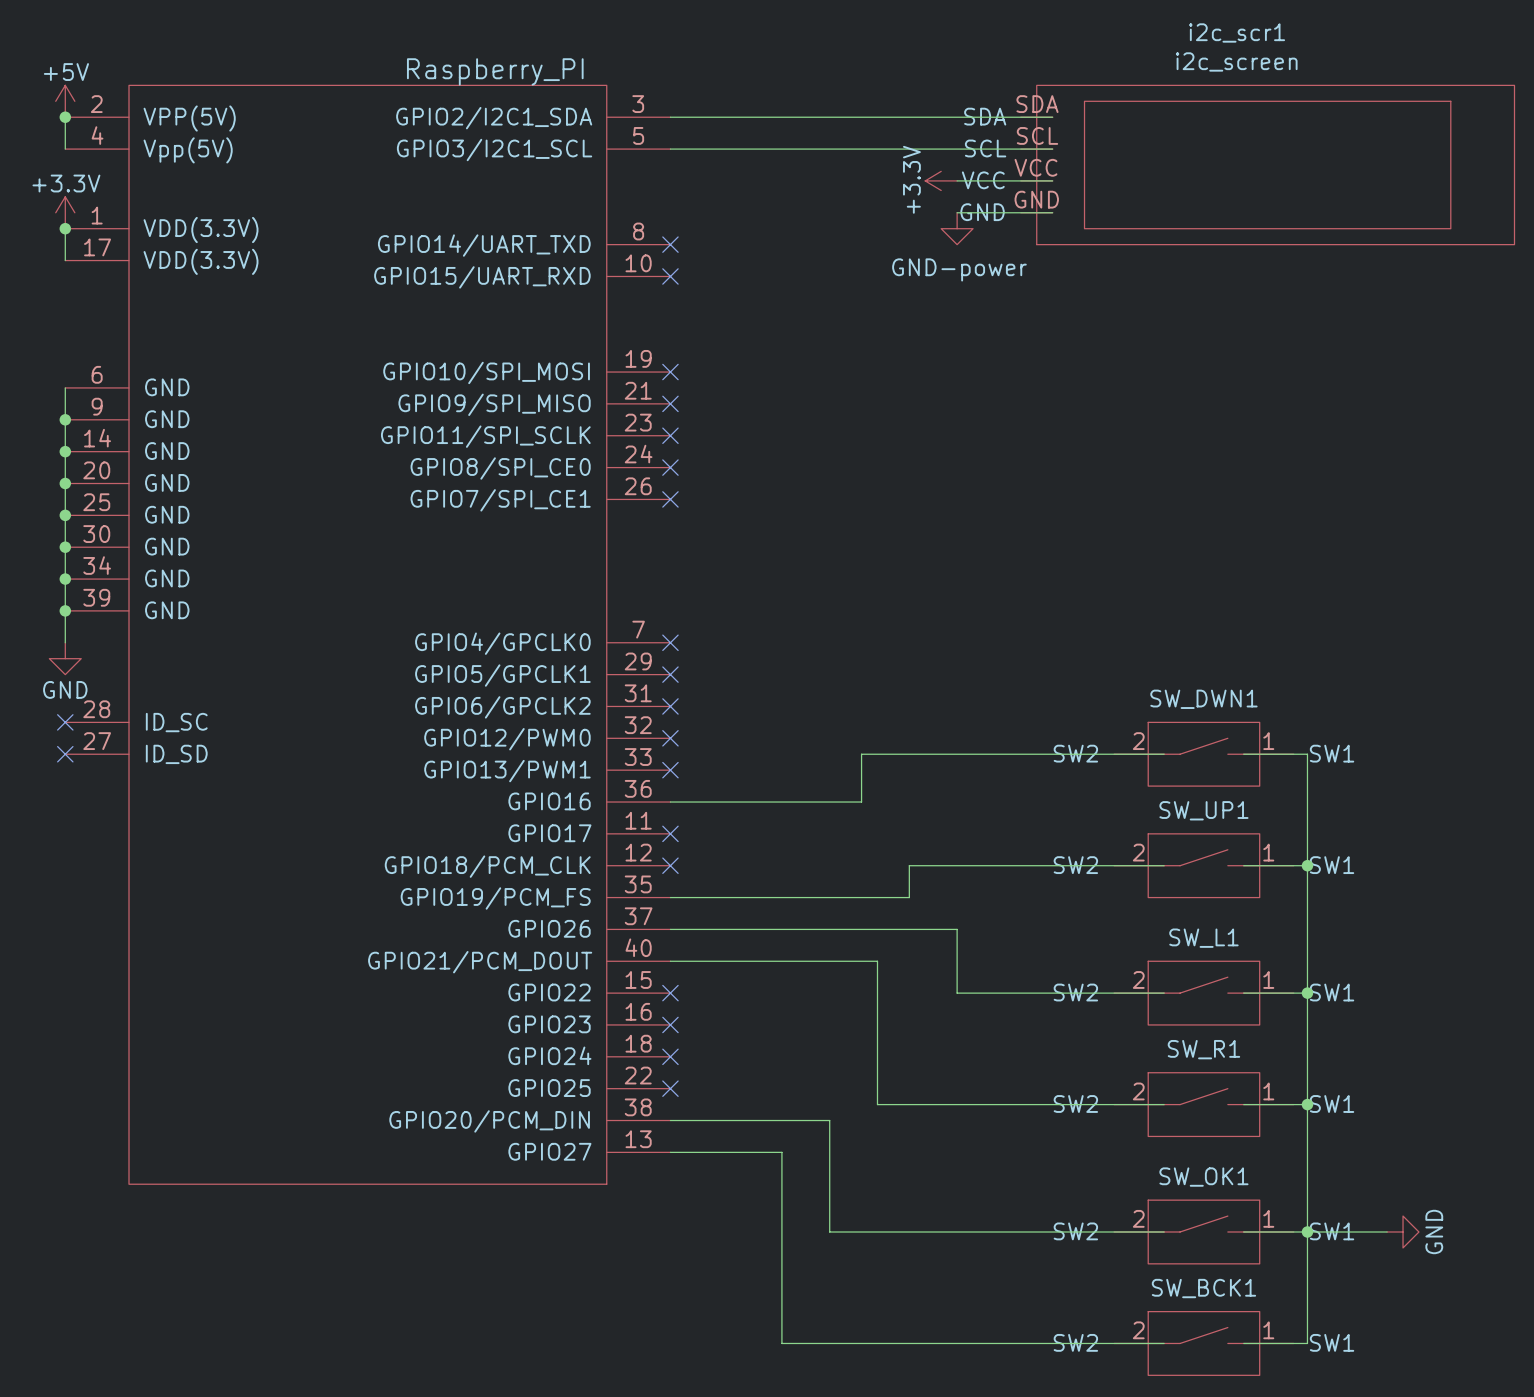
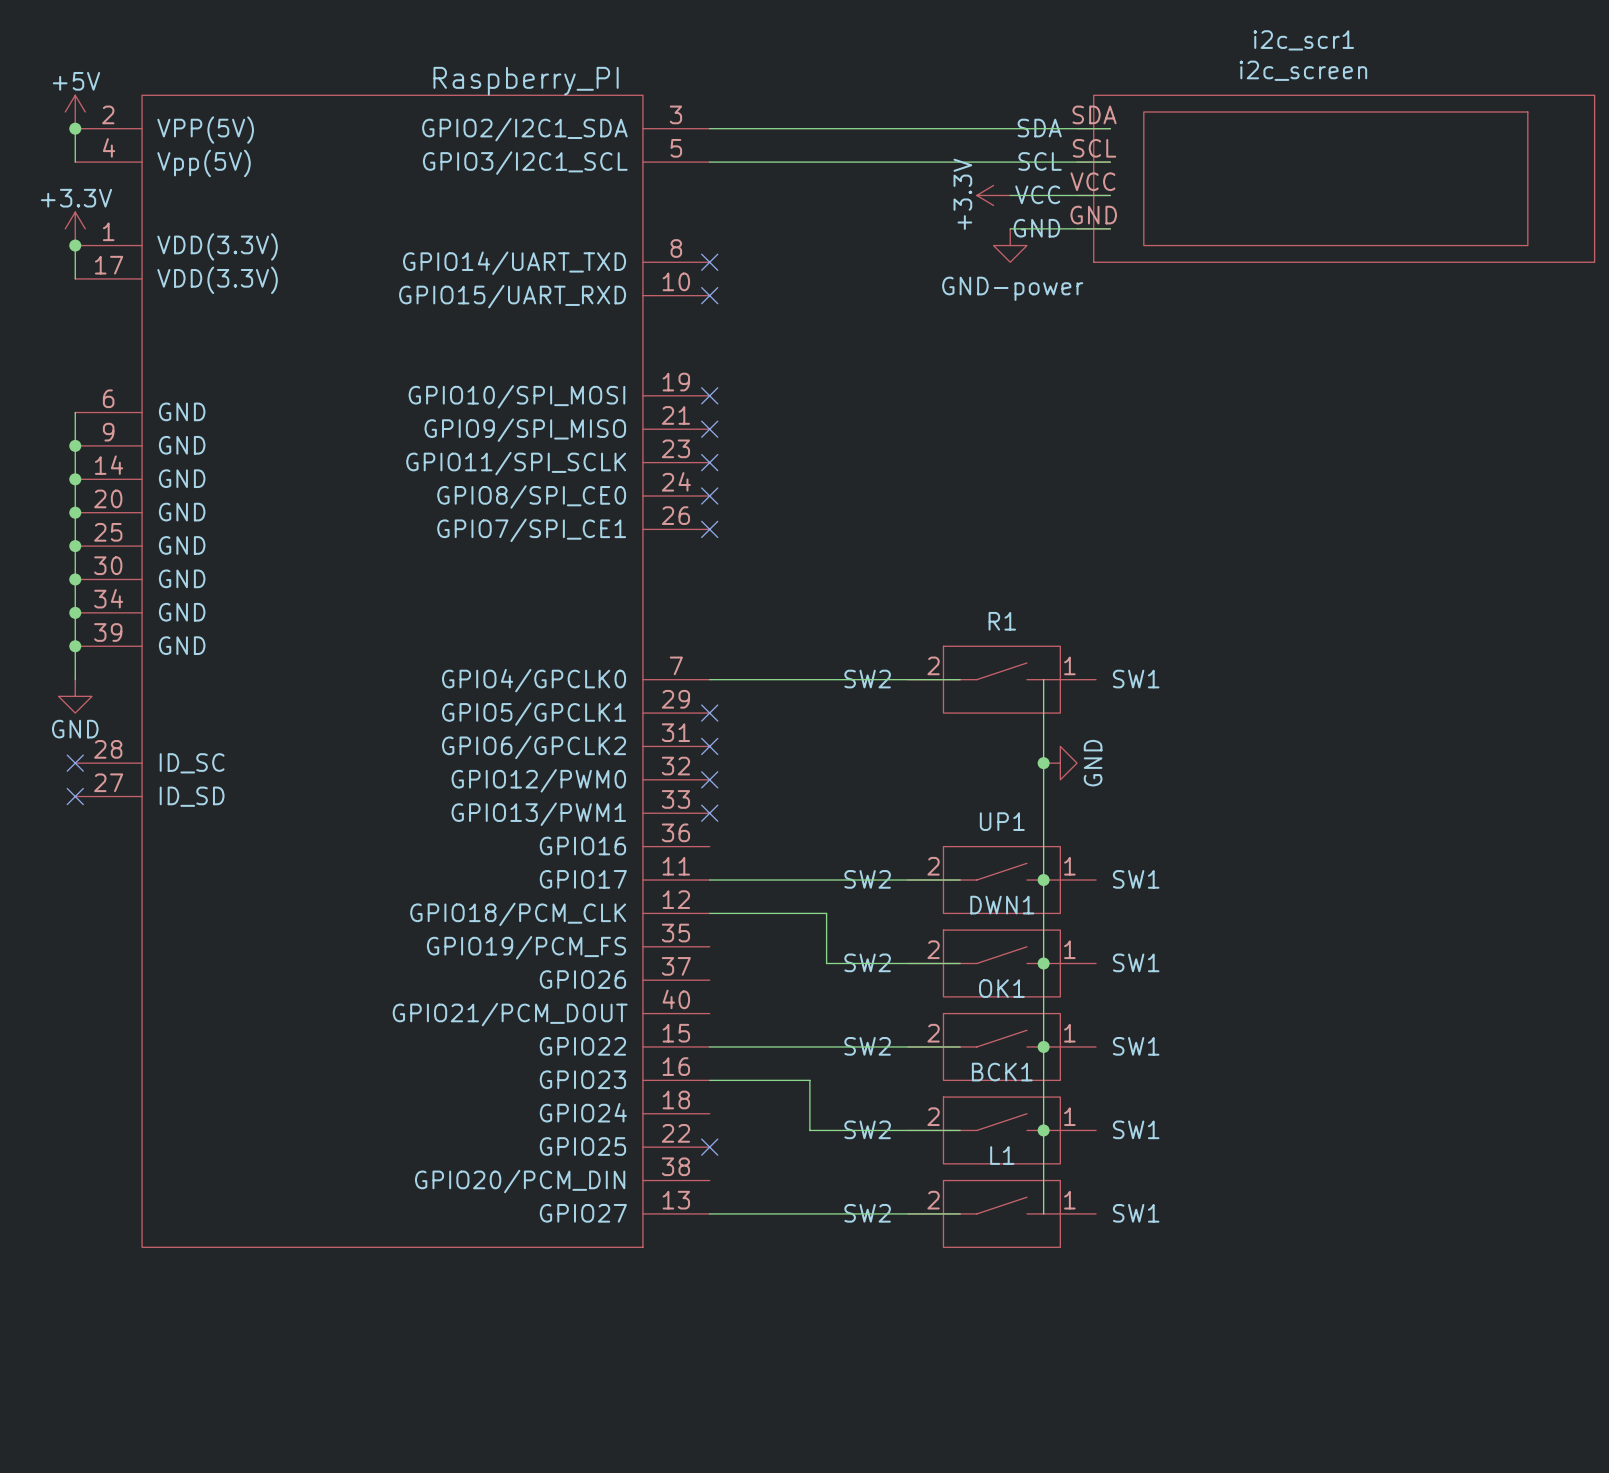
wire: none -> (709, 679) (960, 679)
no-connect mark: (670, 642) -> none
R1: none -> (1001, 679)
wire: none -> (1043, 679) (1043, 1213)
junction: none -> (1043, 763)
power symbol: none -> GND (1060, 763)
wire: (1164, 754) (861, 754) (861, 802) (670, 802) -> none
SW_DWN1: (1203, 754) -> none
wire: (1243, 754) (1307, 754) (1307, 1343) (1243, 1343) -> none
wire: none -> (709, 880) (960, 880)
no-connect mark: (670, 833) -> none
UP1: none -> (1001, 880)
junction: none -> (1043, 880)
wire: none -> (709, 913) (826, 913) (826, 963) (960, 963)
no-connect mark: (670, 865) -> none
wire: (1164, 865) (909, 865) (909, 897) (670, 897) -> none
SW_UP1: (1203, 865) -> none
wire: (1243, 865) (1307, 865) -> none
junction: (1307, 865) -> none
DWN1: none -> (1001, 963)
junction: none -> (1043, 963)
wire: (670, 929) (957, 929) (957, 993) (1164, 993) -> none
wire: (670, 961) (877, 961) (877, 1104) (1164, 1104) -> none
wire: none -> (709, 1046) (960, 1046)
no-connect mark: (670, 993) -> none
OK1: none -> (1001, 1046)
junction: none -> (1043, 1046)
SW_L1: (1203, 993) -> none
wire: (1243, 993) (1307, 993) -> none
junction: (1307, 993) -> none
wire: none -> (709, 1080) (809, 1080) (809, 1130) (960, 1130)
no-connect mark: (670, 1024) -> none
no-connect mark: (670, 1056) -> none
BCK1: none -> (1001, 1130)
junction: none -> (1043, 1130)
SW_R1: (1203, 1104) -> none
wire: (1243, 1104) (1307, 1104) -> none
junction: (1307, 1104) -> none
wire: (670, 1120) (829, 1120) (829, 1231) (1164, 1231) -> none
wire: (781, 1152) (781, 1343) (1164, 1343) -> (826, 1213) (960, 1213)
L1: none -> (1001, 1213)
SW_OK1: (1203, 1231) -> none
wire: (1243, 1231) (1387, 1231) -> none
junction: (1307, 1231) -> none
power symbol: GND (1403, 1231) -> none
SW_BCK1: (1203, 1343) -> none

